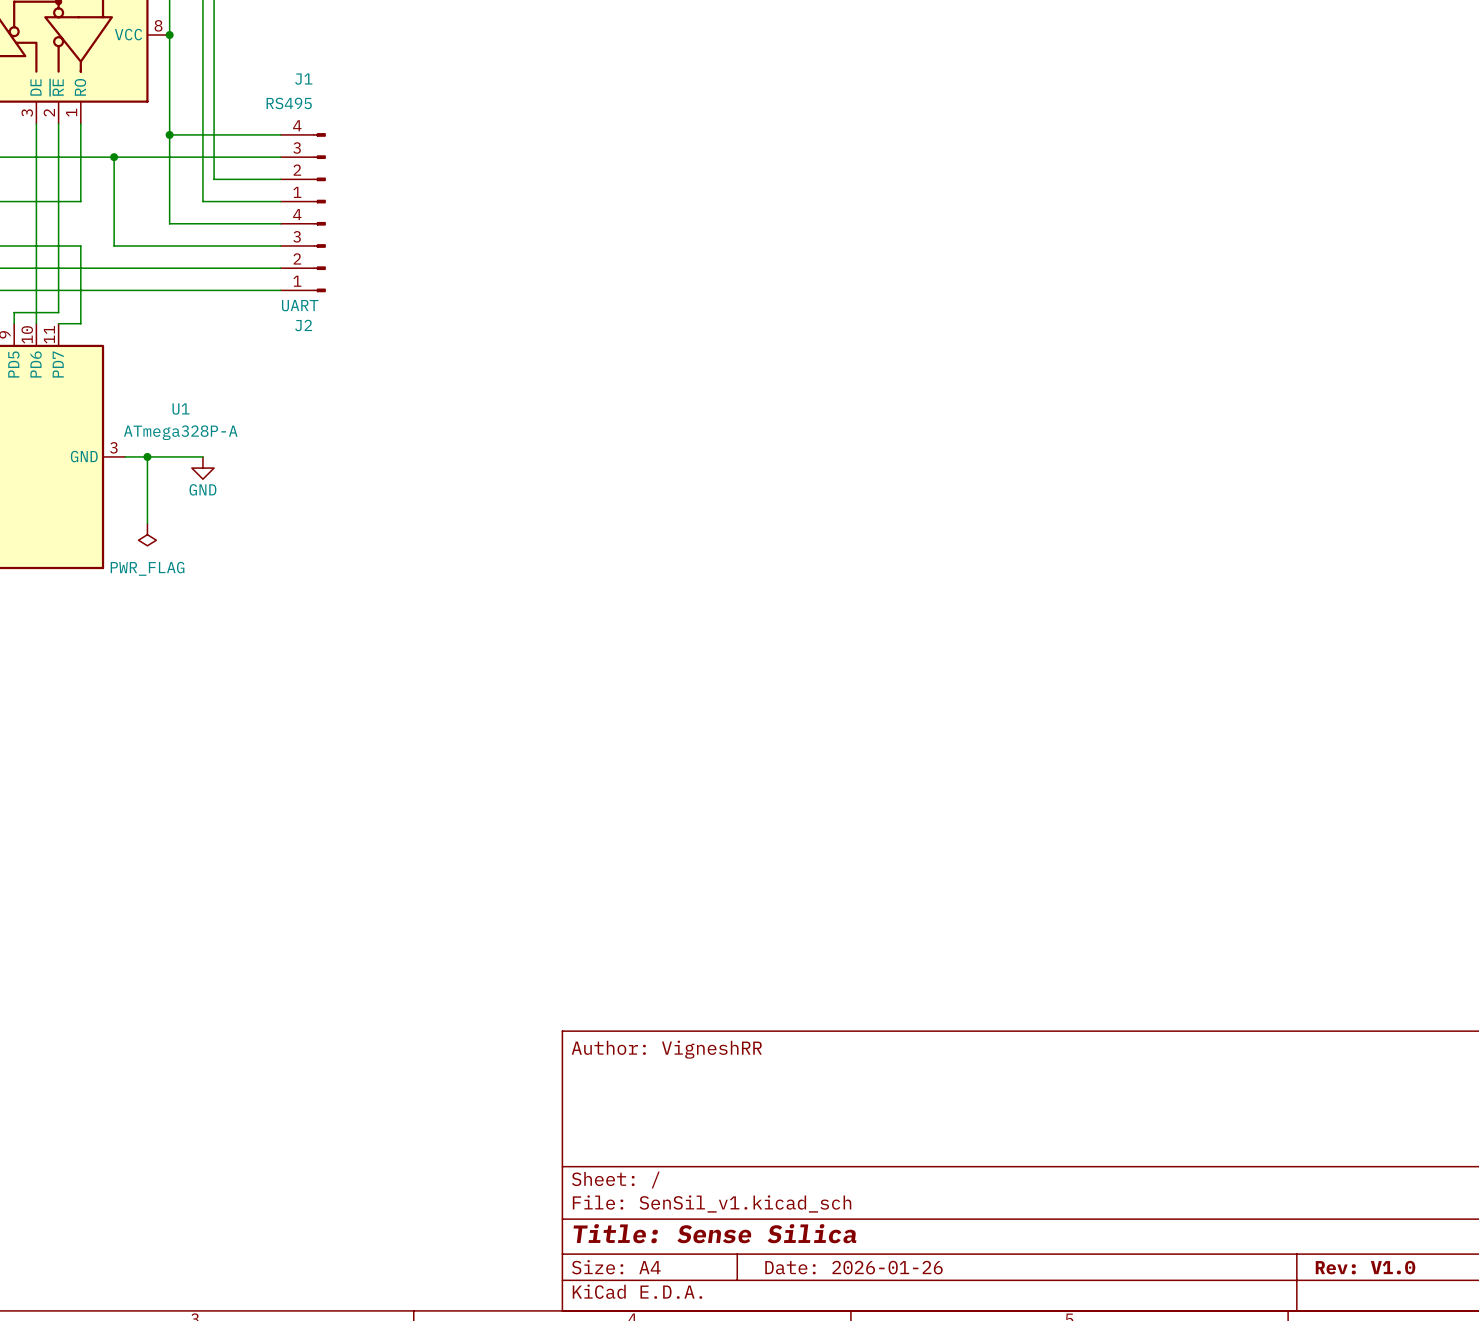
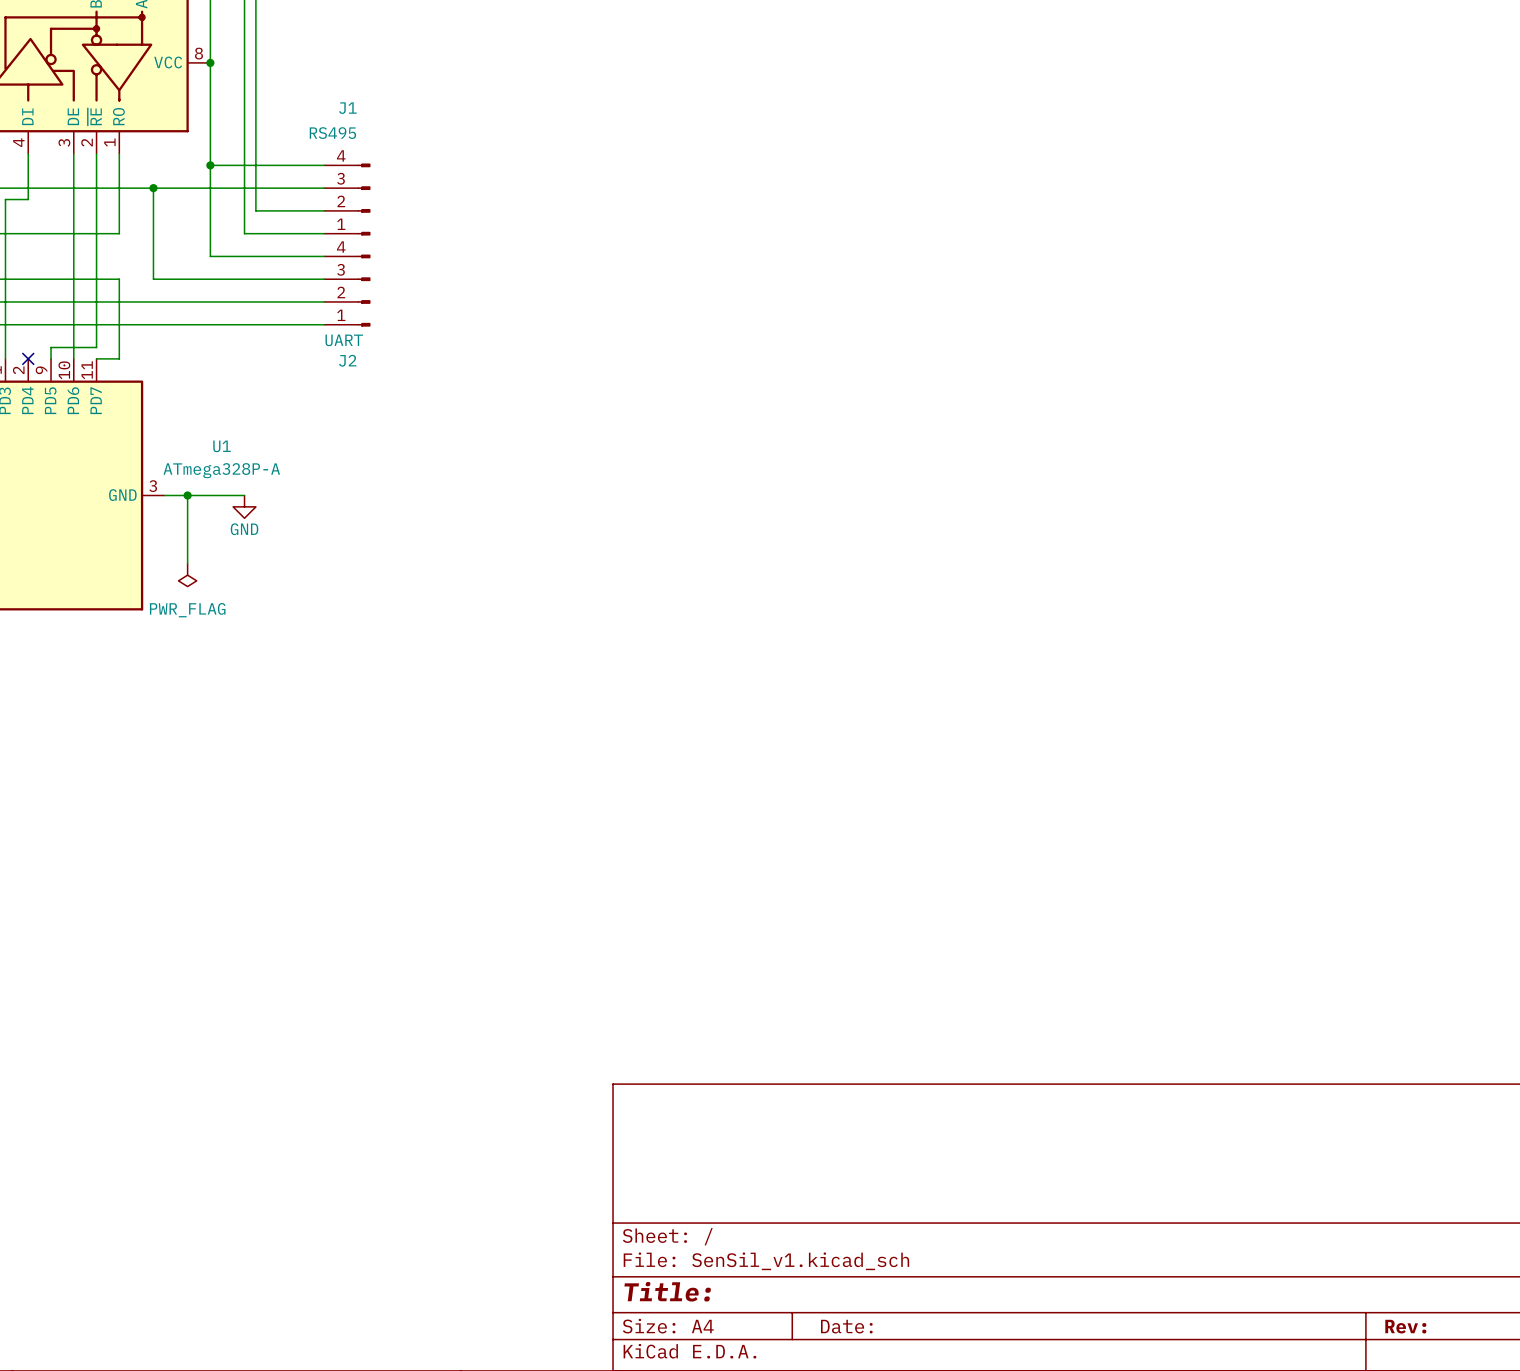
title block: Author: VigneshRR (666, 1049) -> none
title block: Title: Sense Silica (714, 1233) -> Title: (667, 1291)
title block: Date: 2026-01-26 (853, 1267) -> Date: (846, 1326)
title block: Rev: V1.0 (1365, 1267) -> Rev: (1405, 1326)

